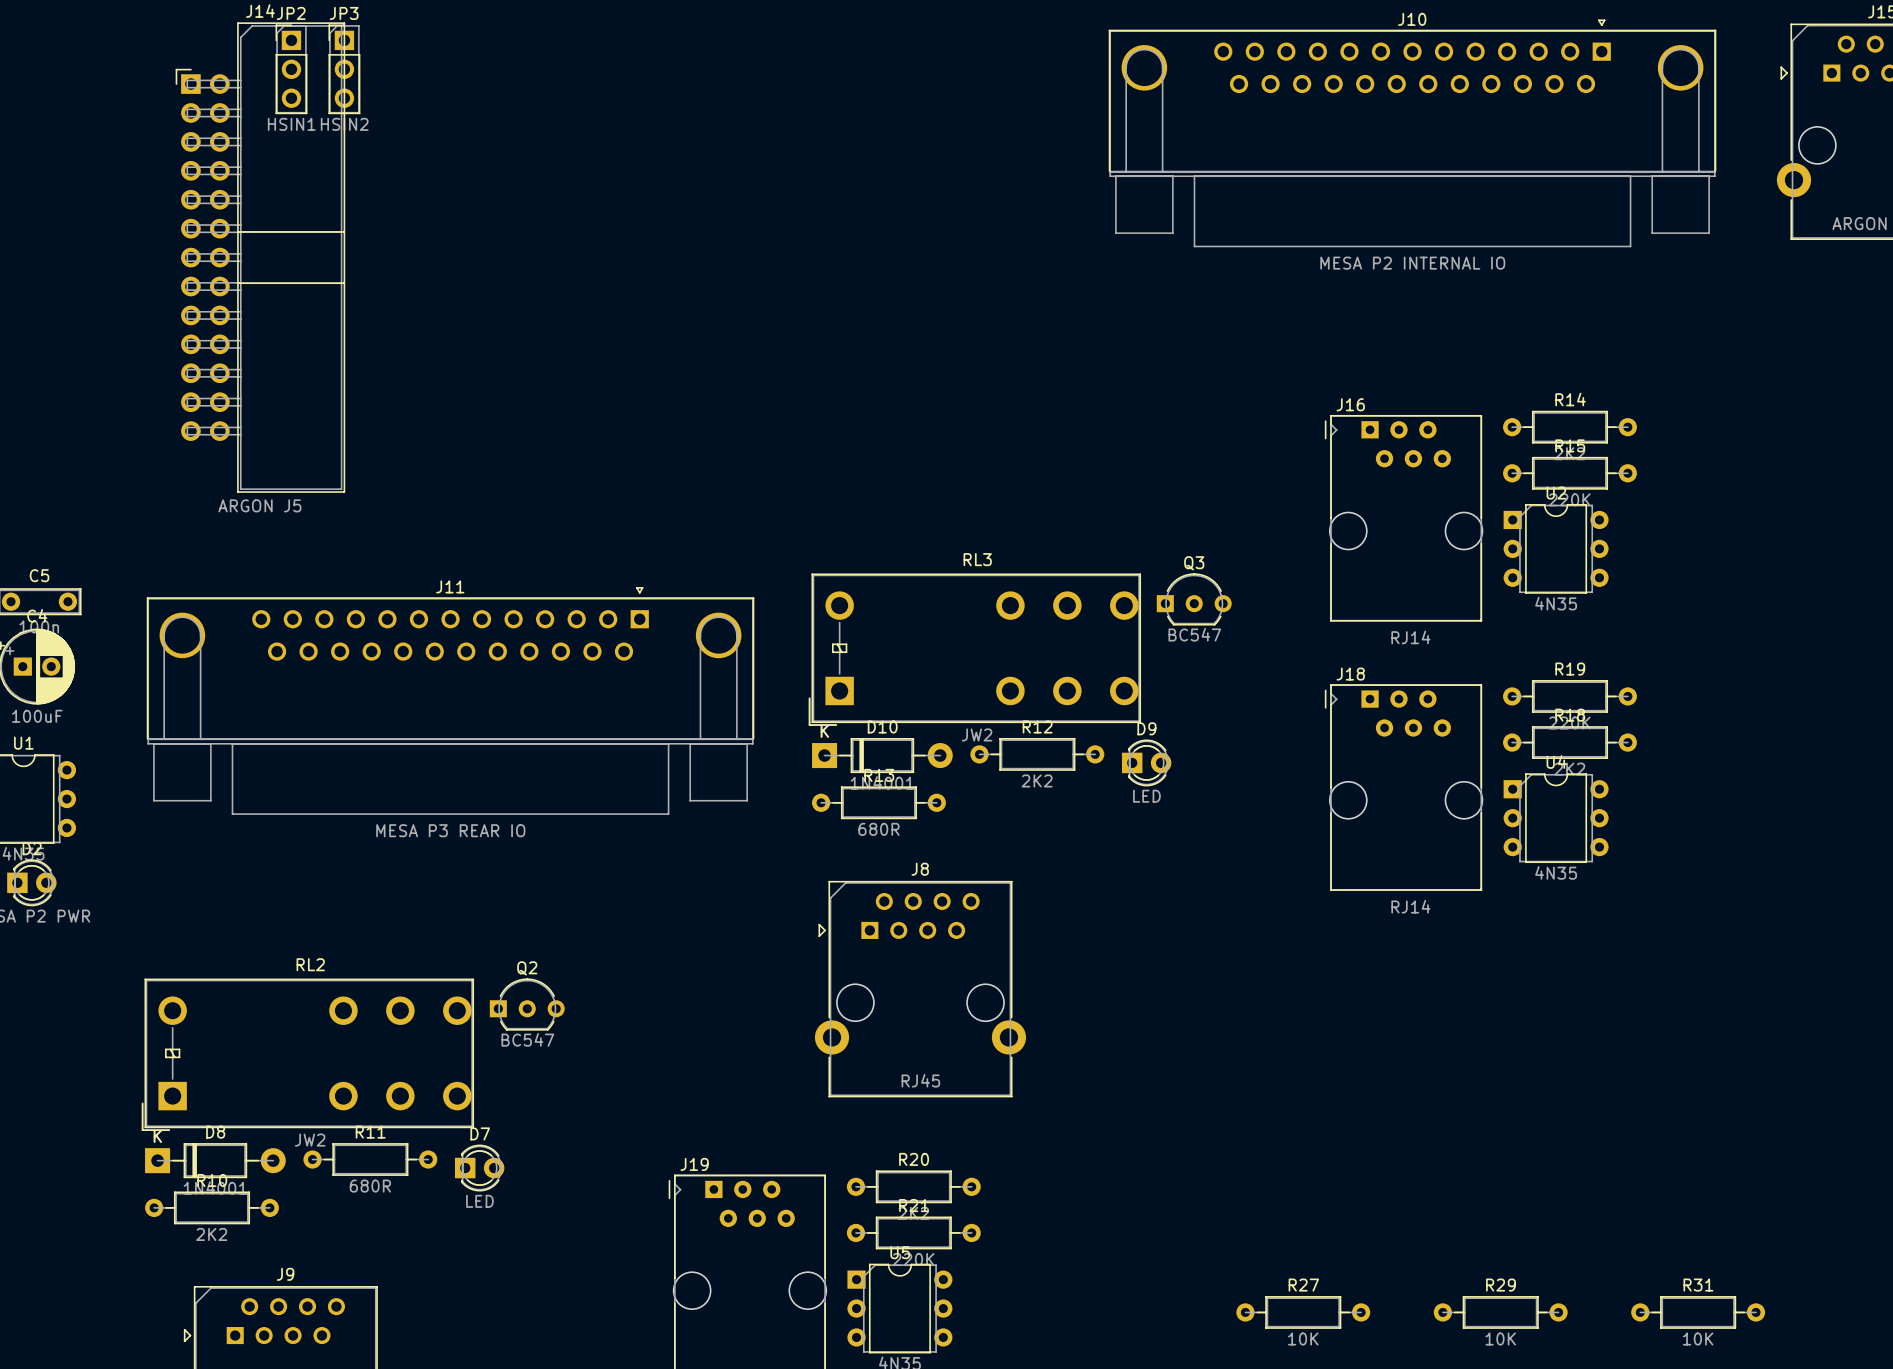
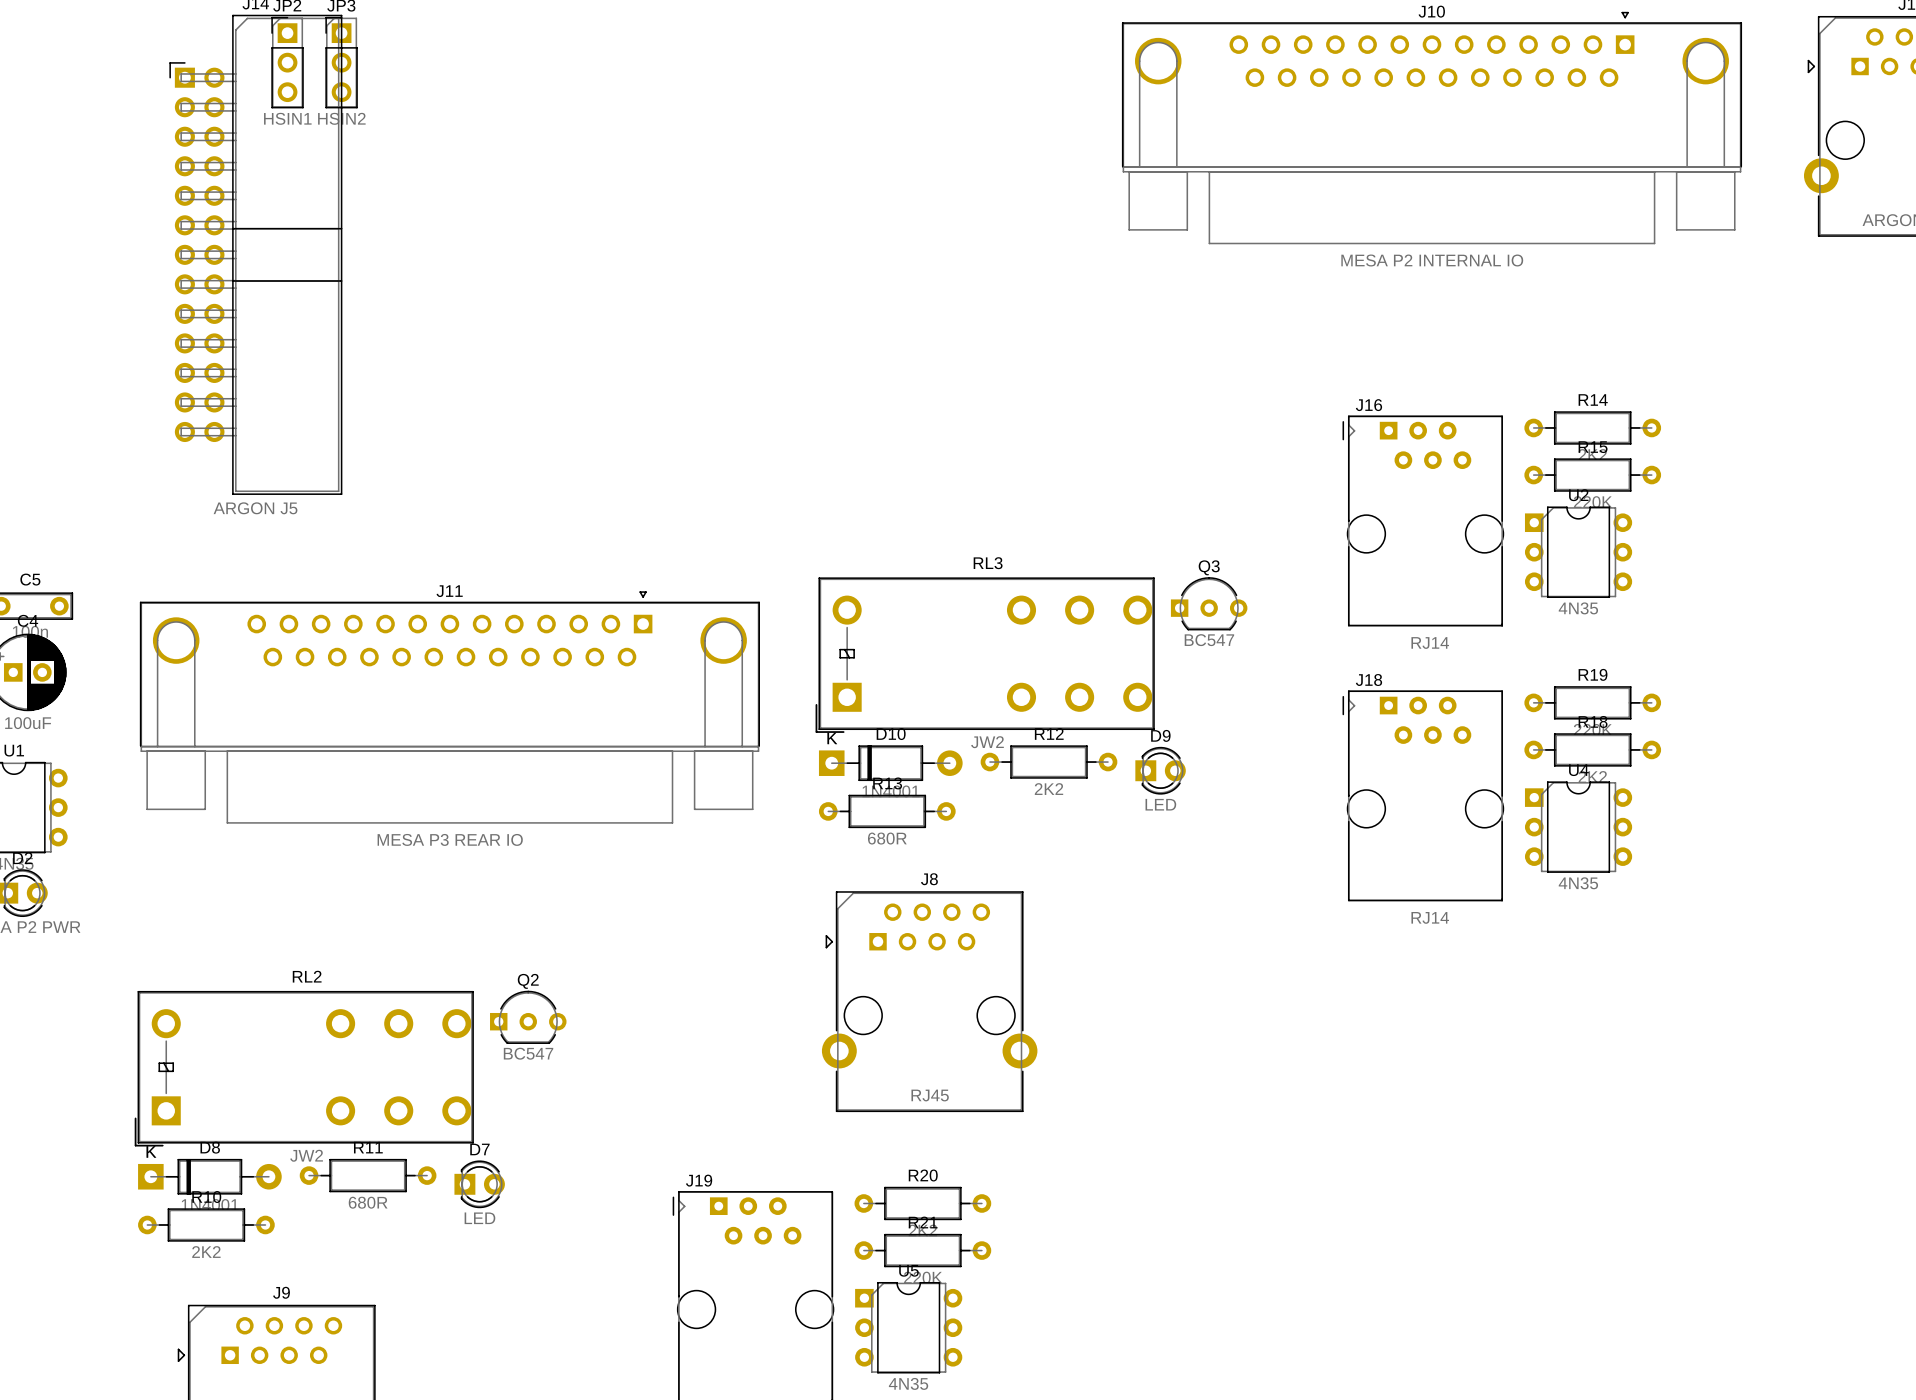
R27: 10K (1303, 1312) -> none
R29: 10K (1500, 1312) -> none
R31: 10K (1698, 1312) -> none

